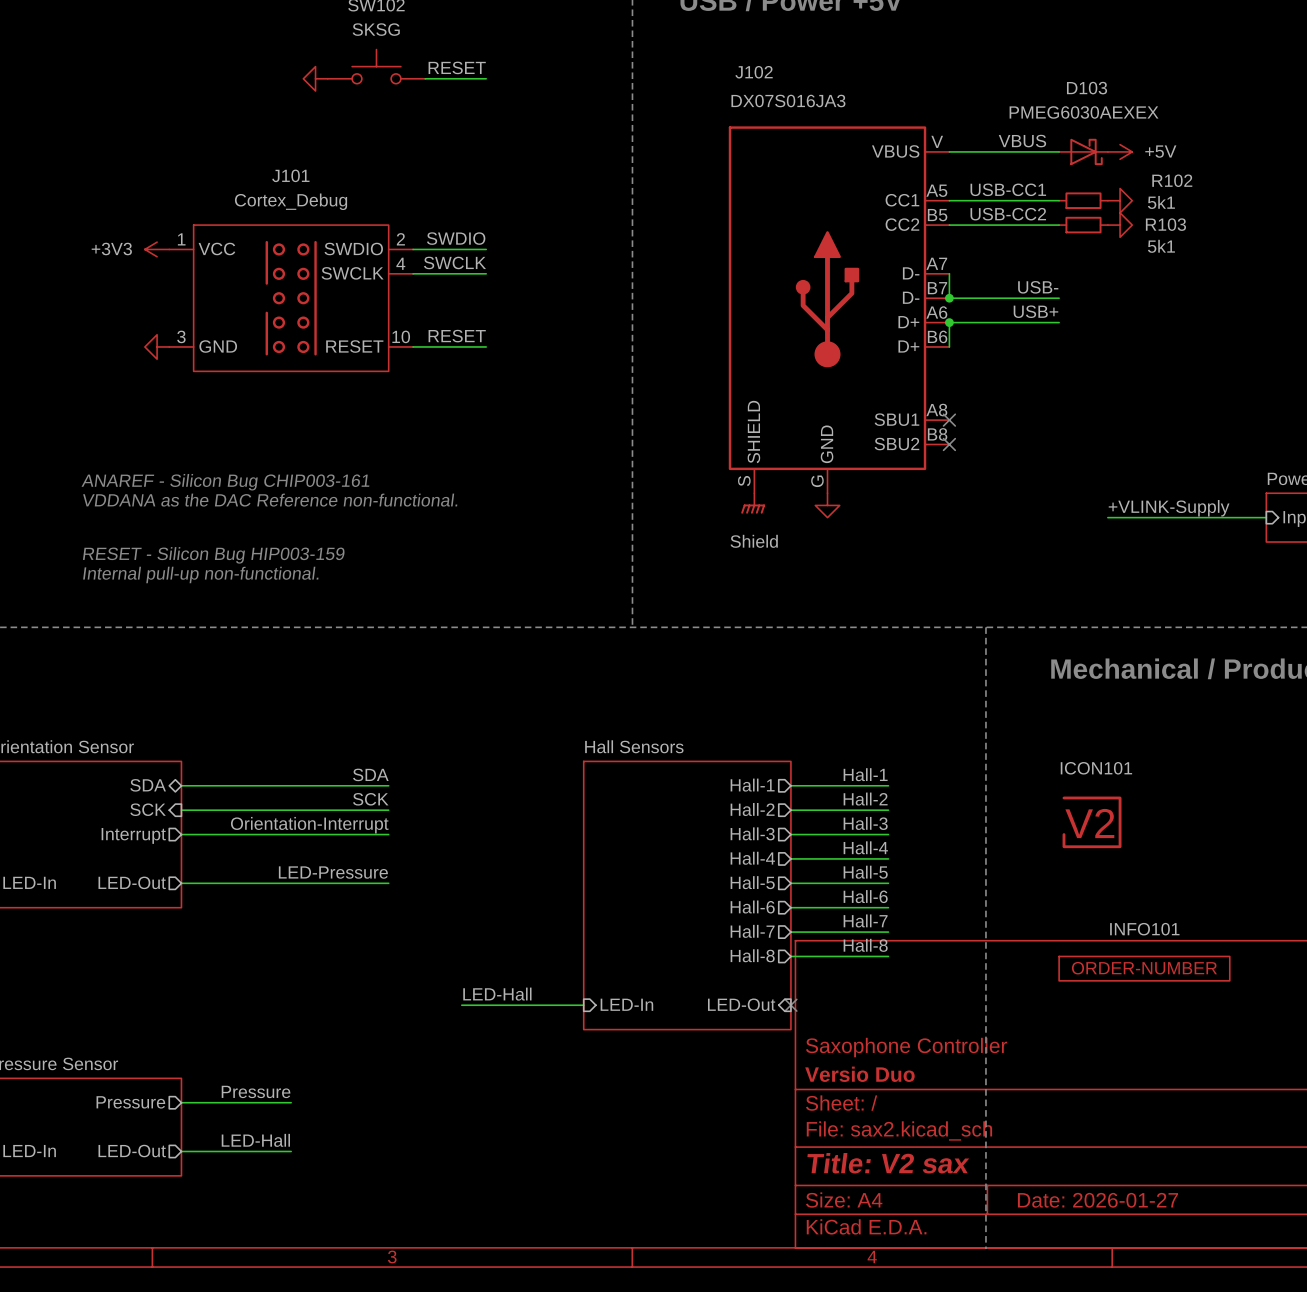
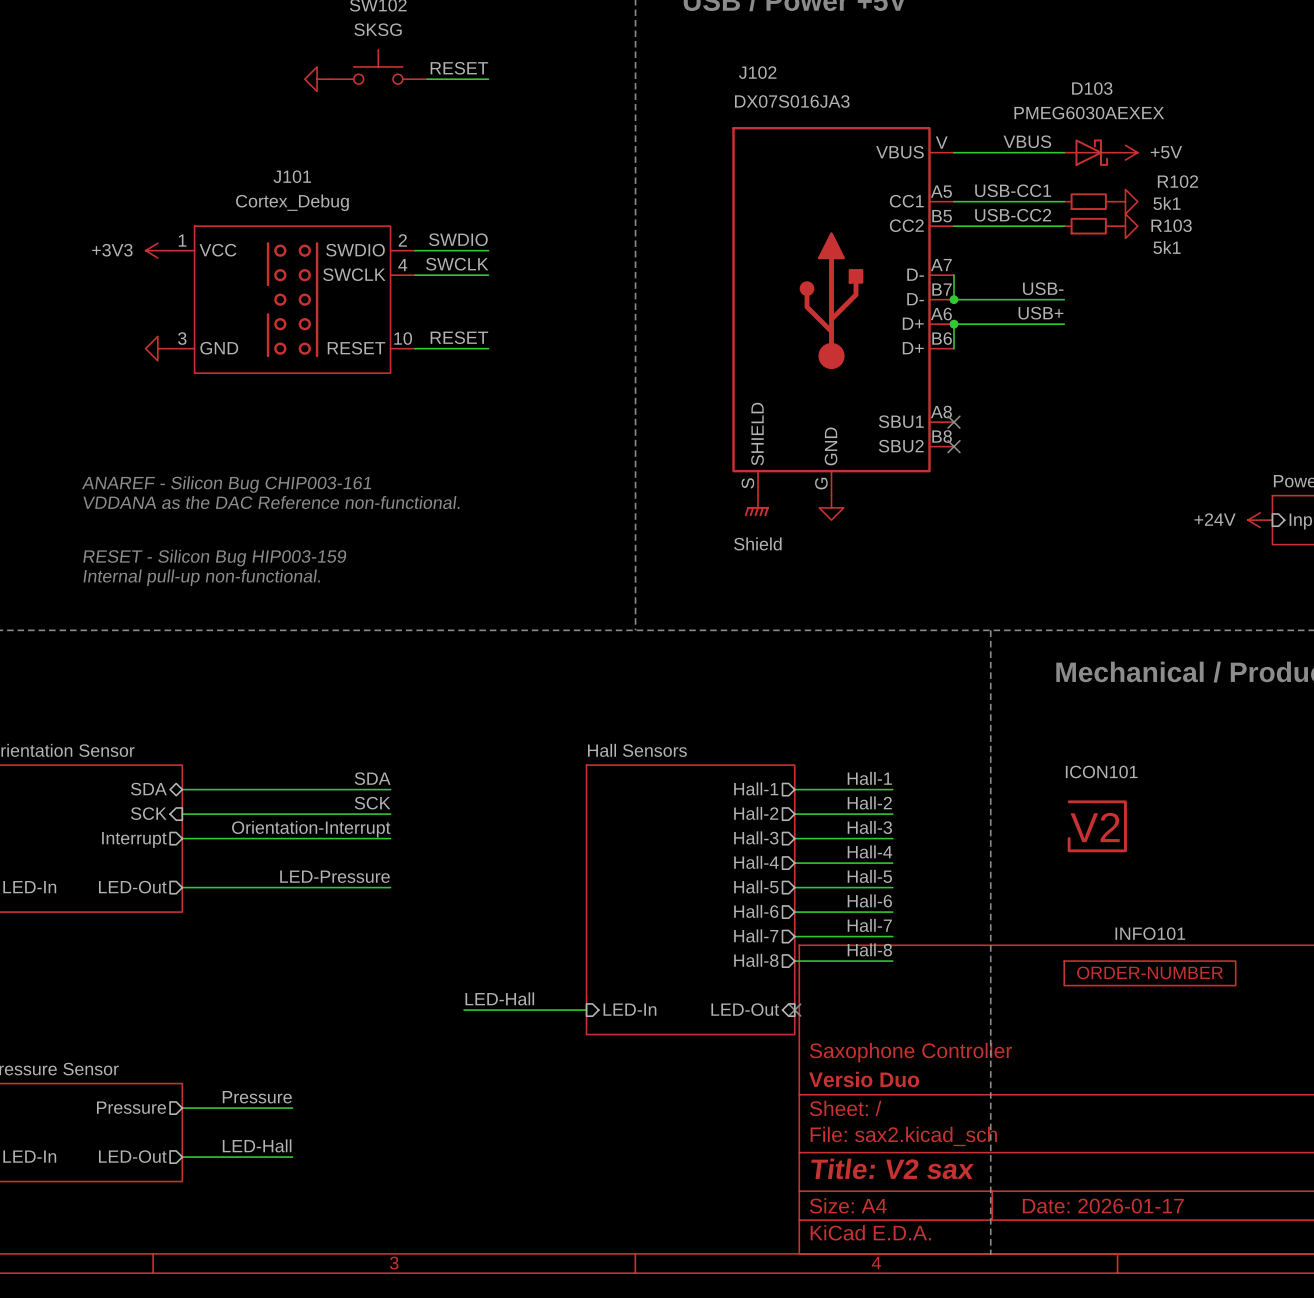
label: +VLINK-Supply (1169, 508) -> none
wire: (1107, 517) (1266, 517) -> none
power symbol: none -> +24V (1260, 520)
title block: Date: 2026-01-27 (1097, 1200) -> Date: 2026-01-17 (1103, 1206)

